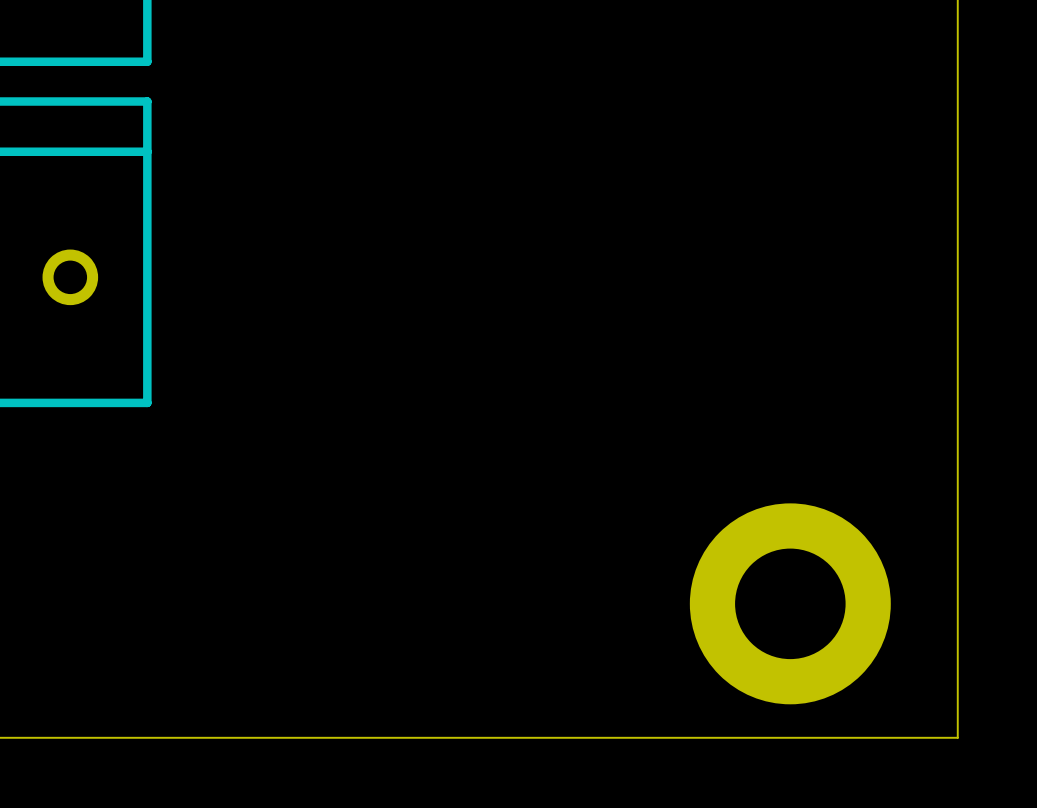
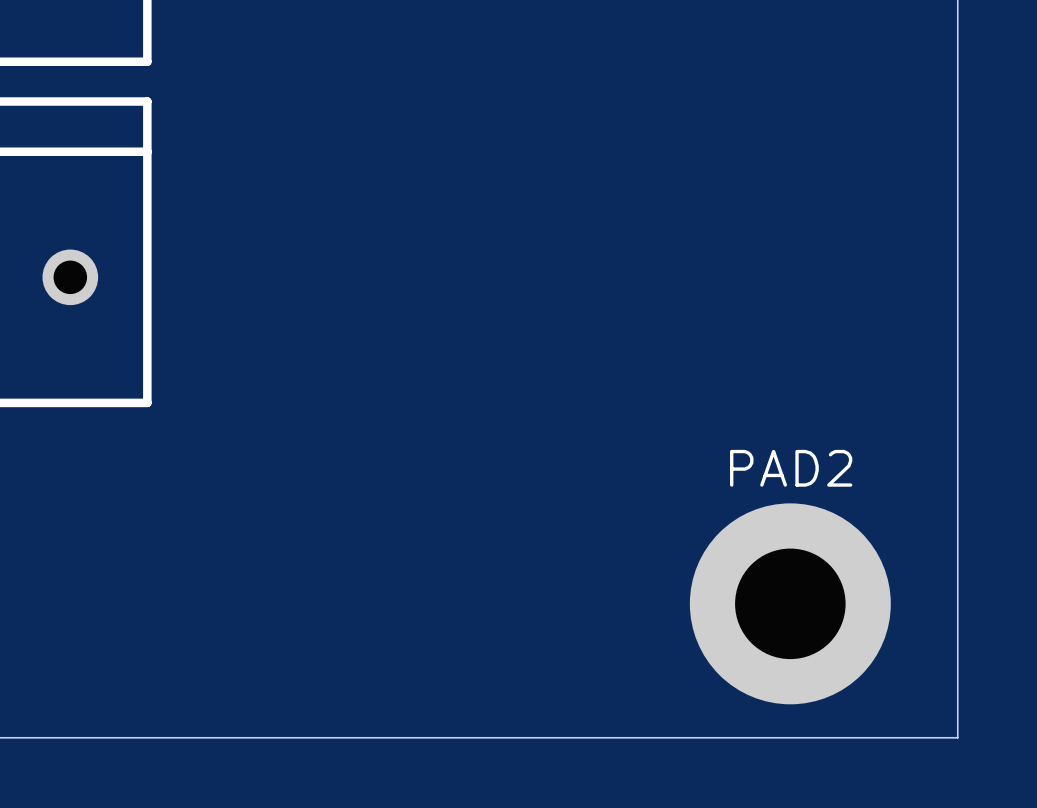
PAD2 name: none -> PAD2 (791, 468)

